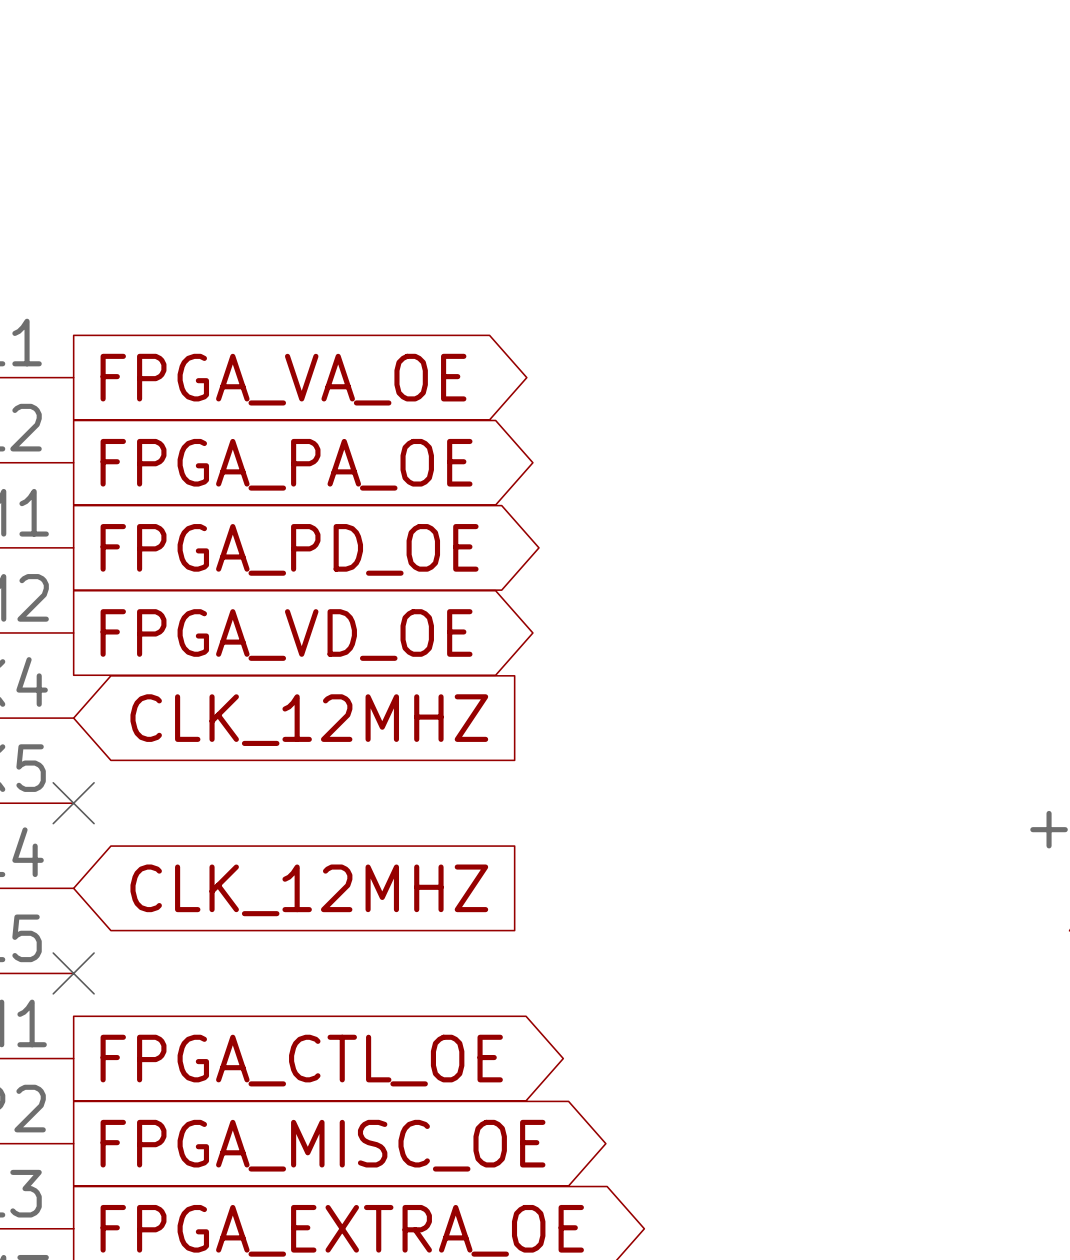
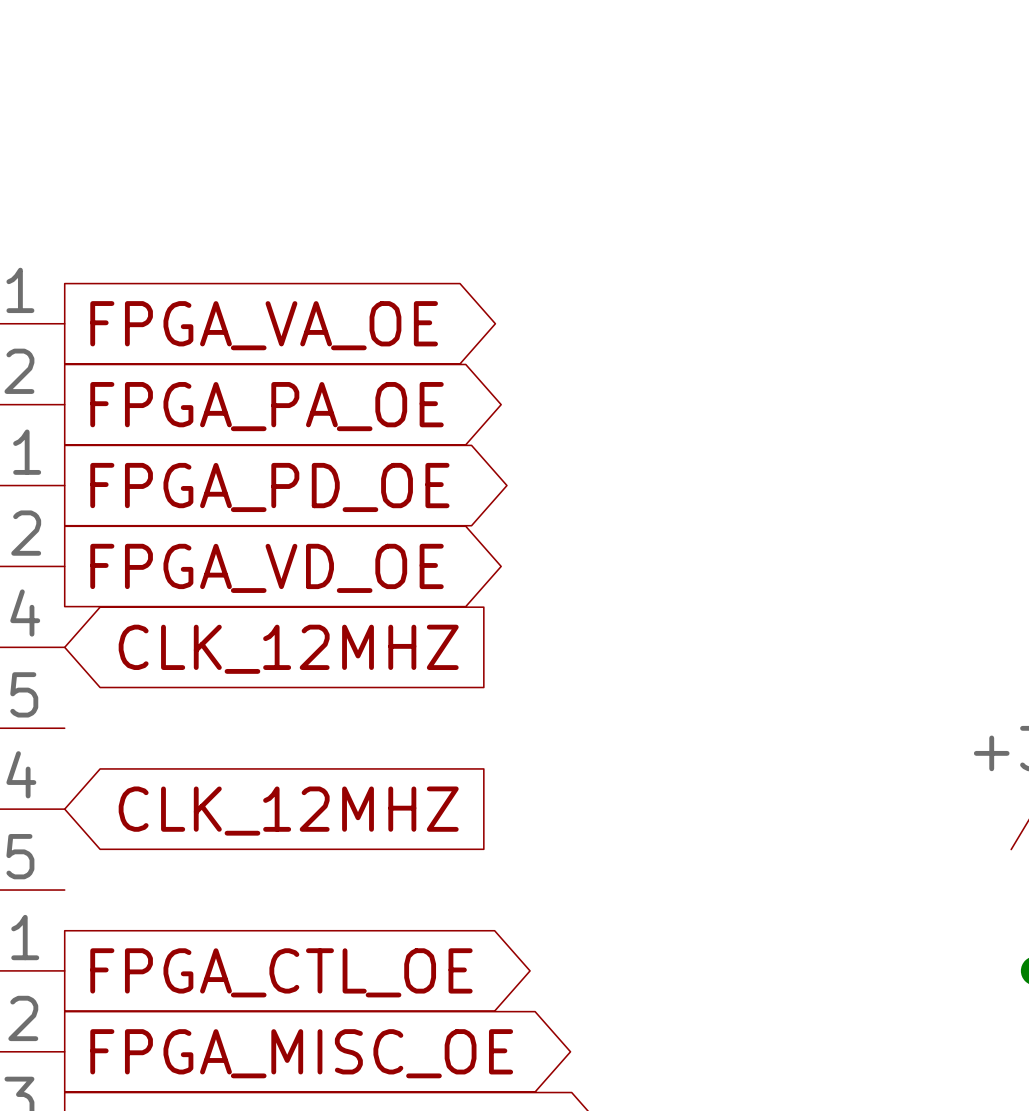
no-connect mark: (73, 803) -> none
no-connect mark: (73, 973) -> none

